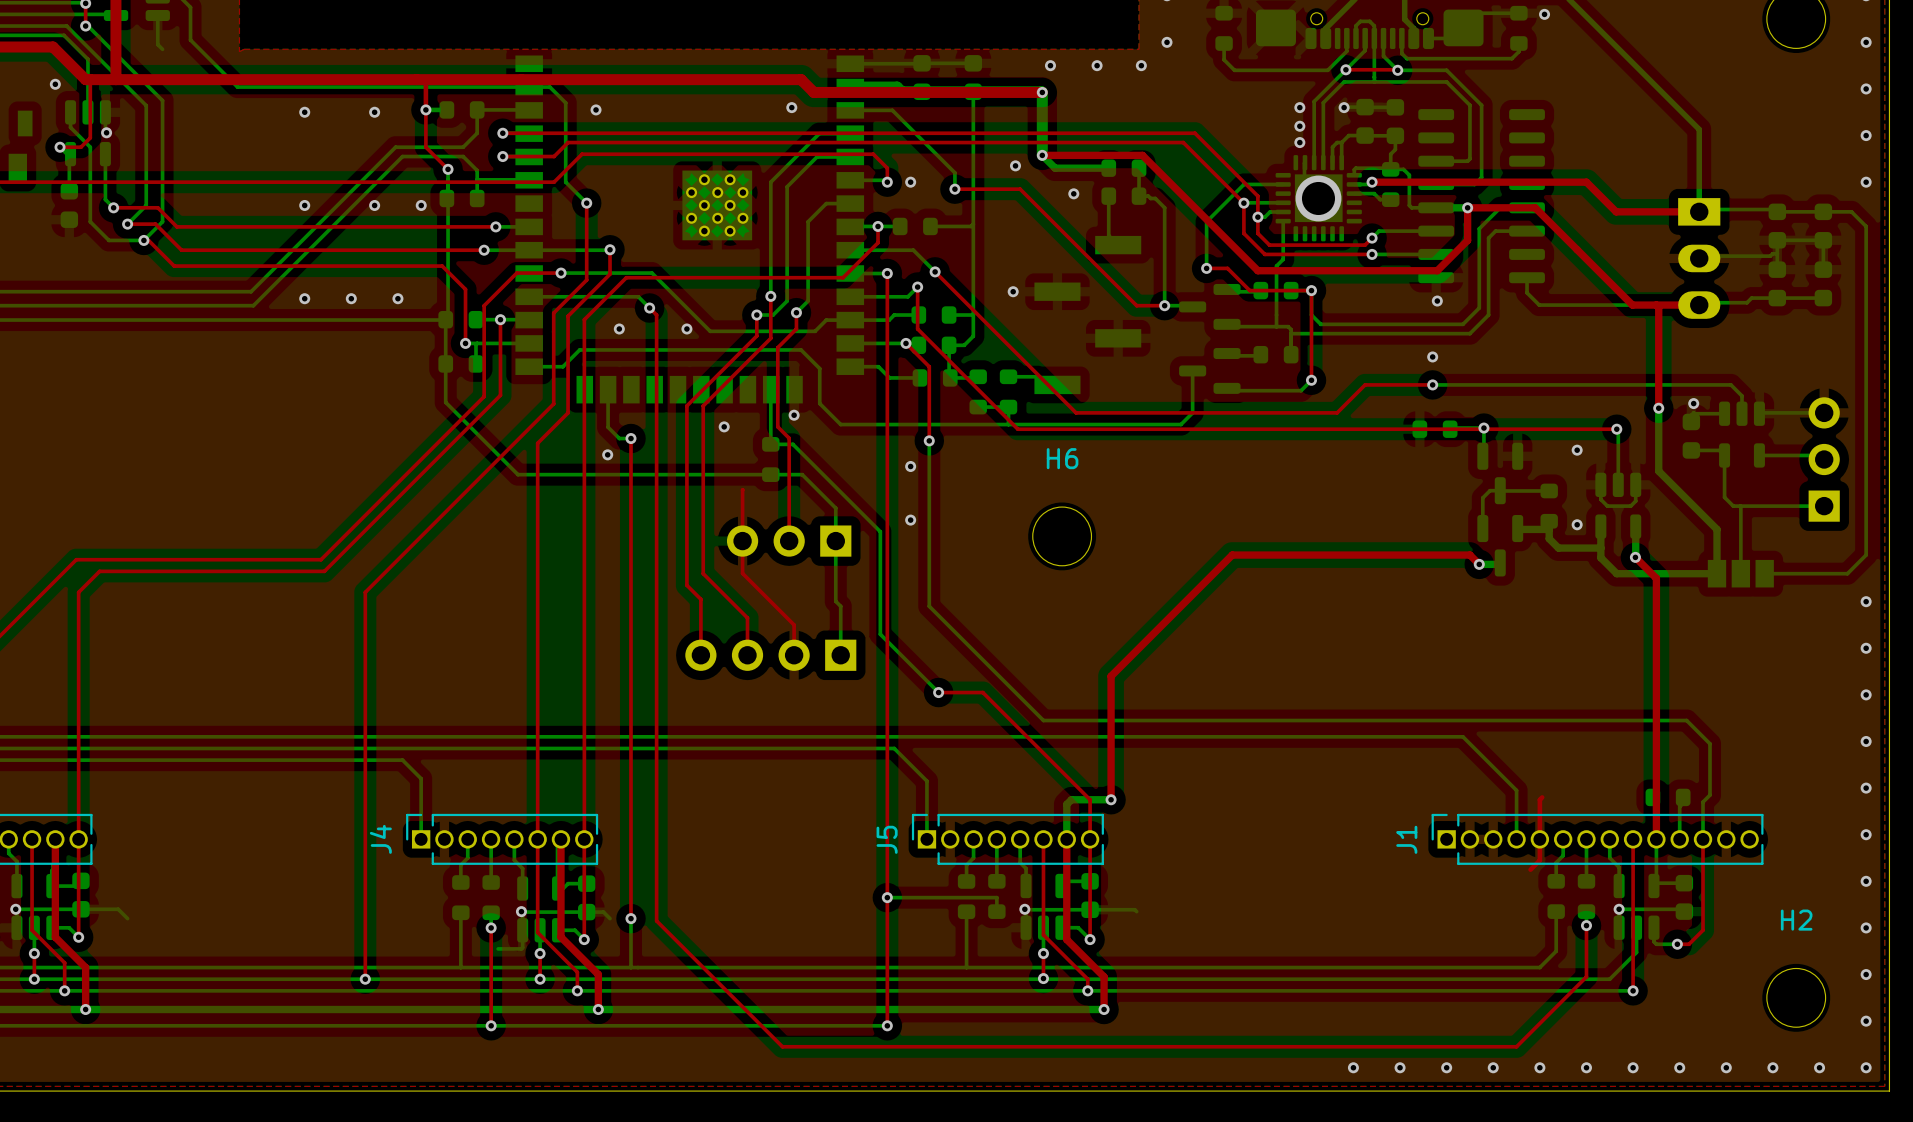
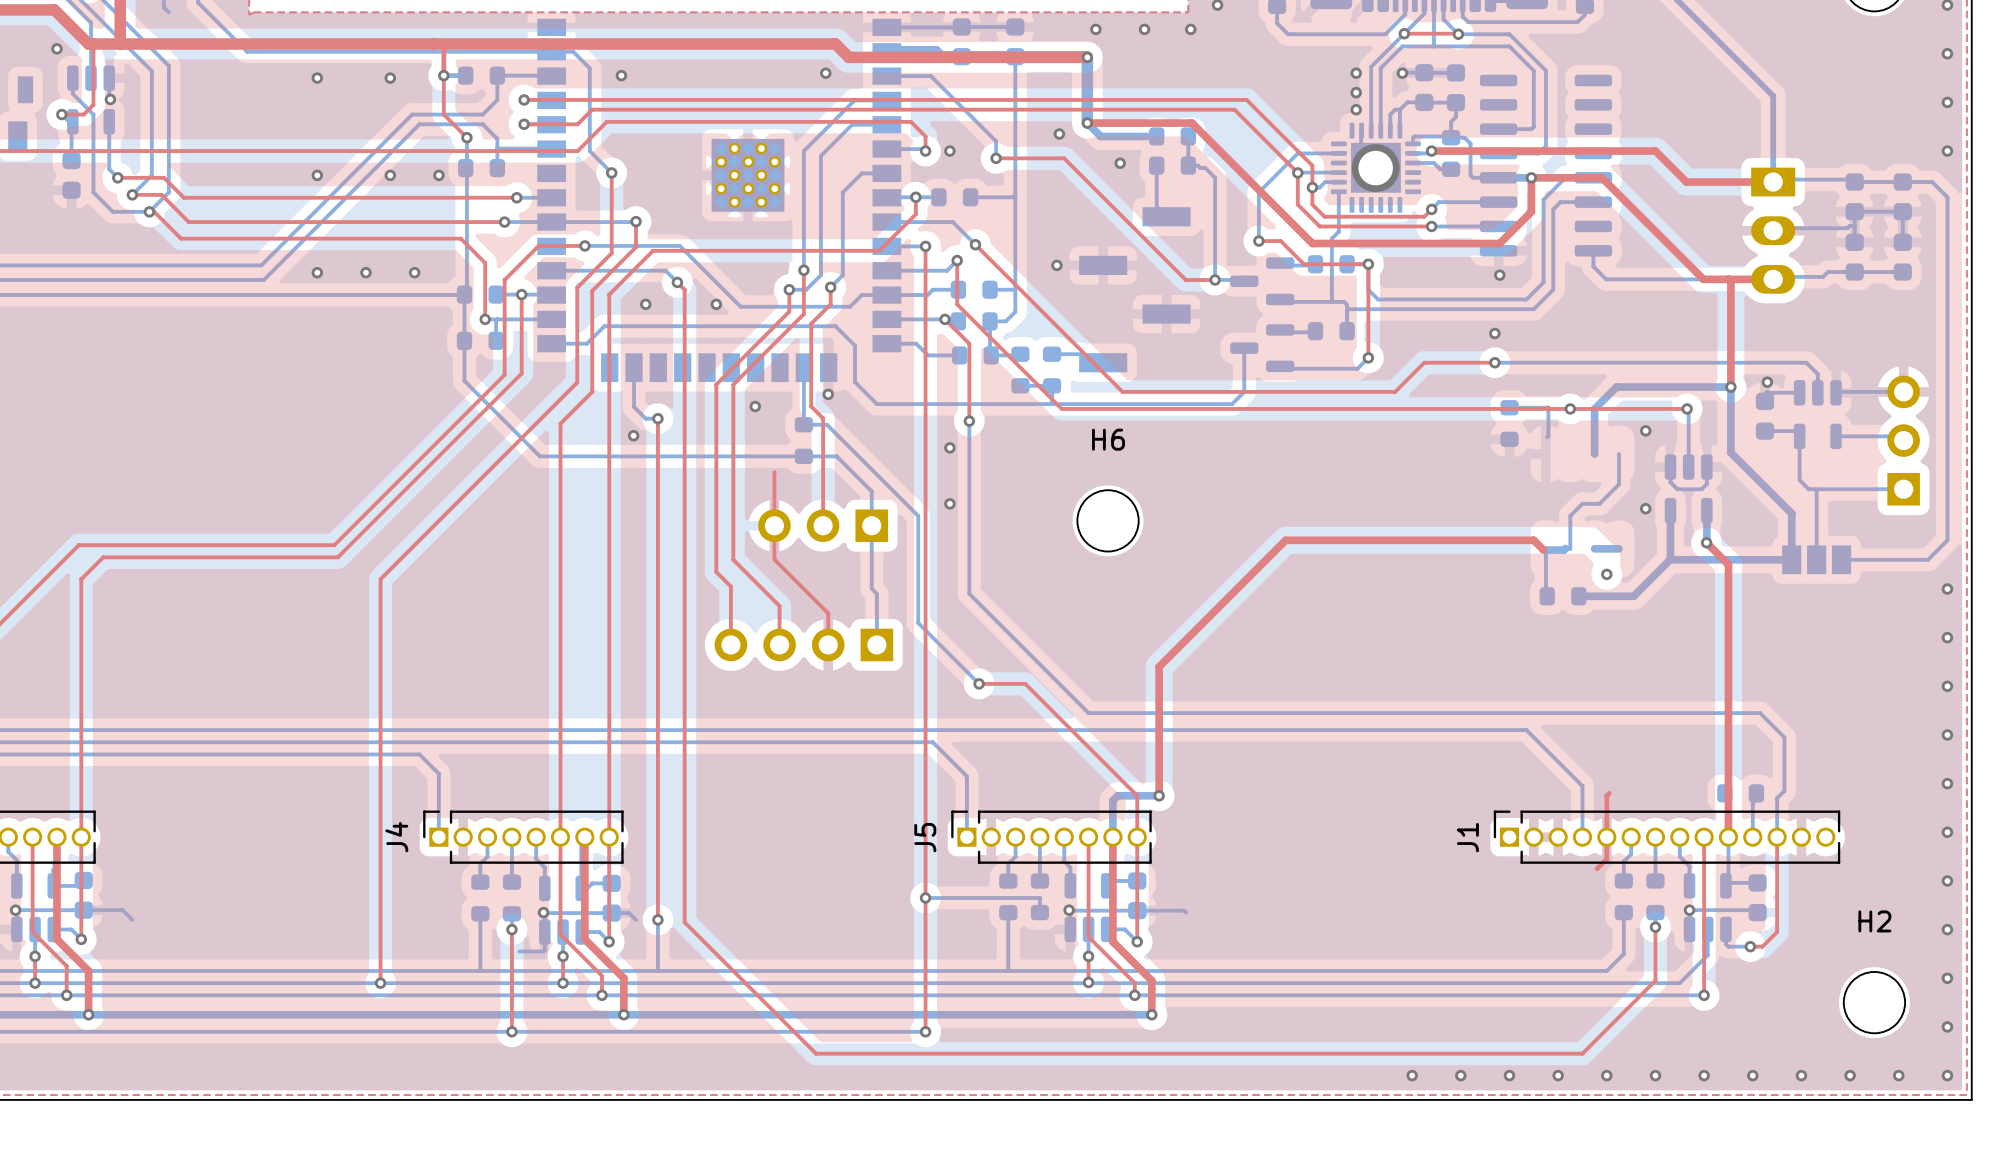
bottom track: none -> (1730, 387) (1616, 387) (1594, 408) (1594, 453)
via position: (1483, 428) -> (1570, 408)
part rotation: 0° (1435, 429) -> 90° clockwise (1509, 423)
bottom track: none -> (1618, 453) (1618, 484) (1599, 503) (1582, 503) (1570, 516) (1570, 548) (1545, 548) (1547, 596)
part: (1500, 473) -> none
bottom track: (1549, 490) (1490, 490) (1482, 497) (1482, 528) -> none
part rotation: 0° (1549, 506) -> 90° clockwise (1563, 596)
part position: (1549, 506) -> (1563, 596)
bottom track: (1549, 521) (1549, 538) (1558, 548) (1600, 548) -> none
bottom track: (1517, 528) (1549, 529) -> none
part: (1500, 545) -> none
bottom track: (1600, 557) (1616, 573) -> (1670, 559) (1687, 559)
bottom track: none -> (1670, 543) (1670, 559)
bottom track: none -> (1594, 548) (1618, 548)
via position: (1479, 564) -> (1606, 574)
bottom track: none -> (1670, 559) (1633, 596) (1578, 596)

